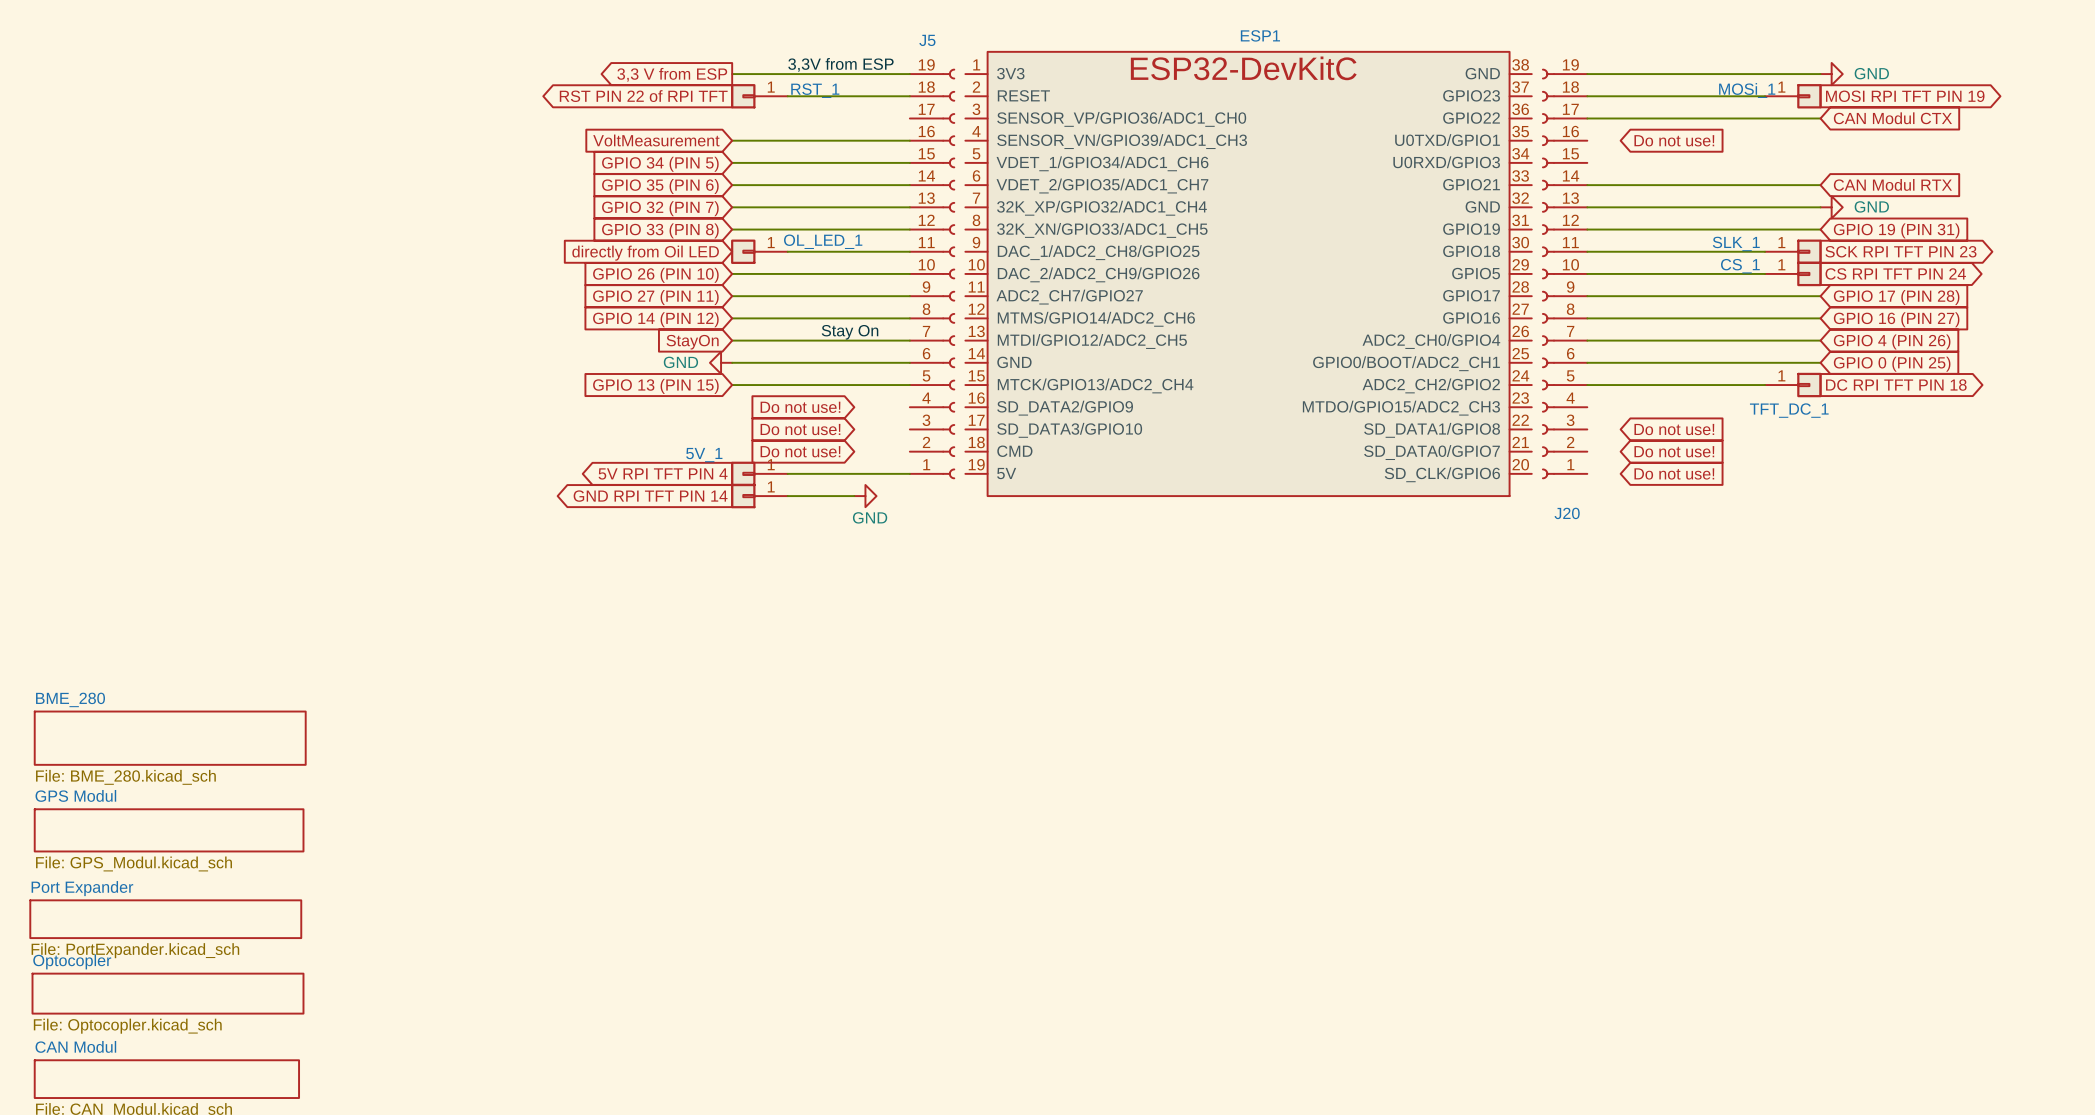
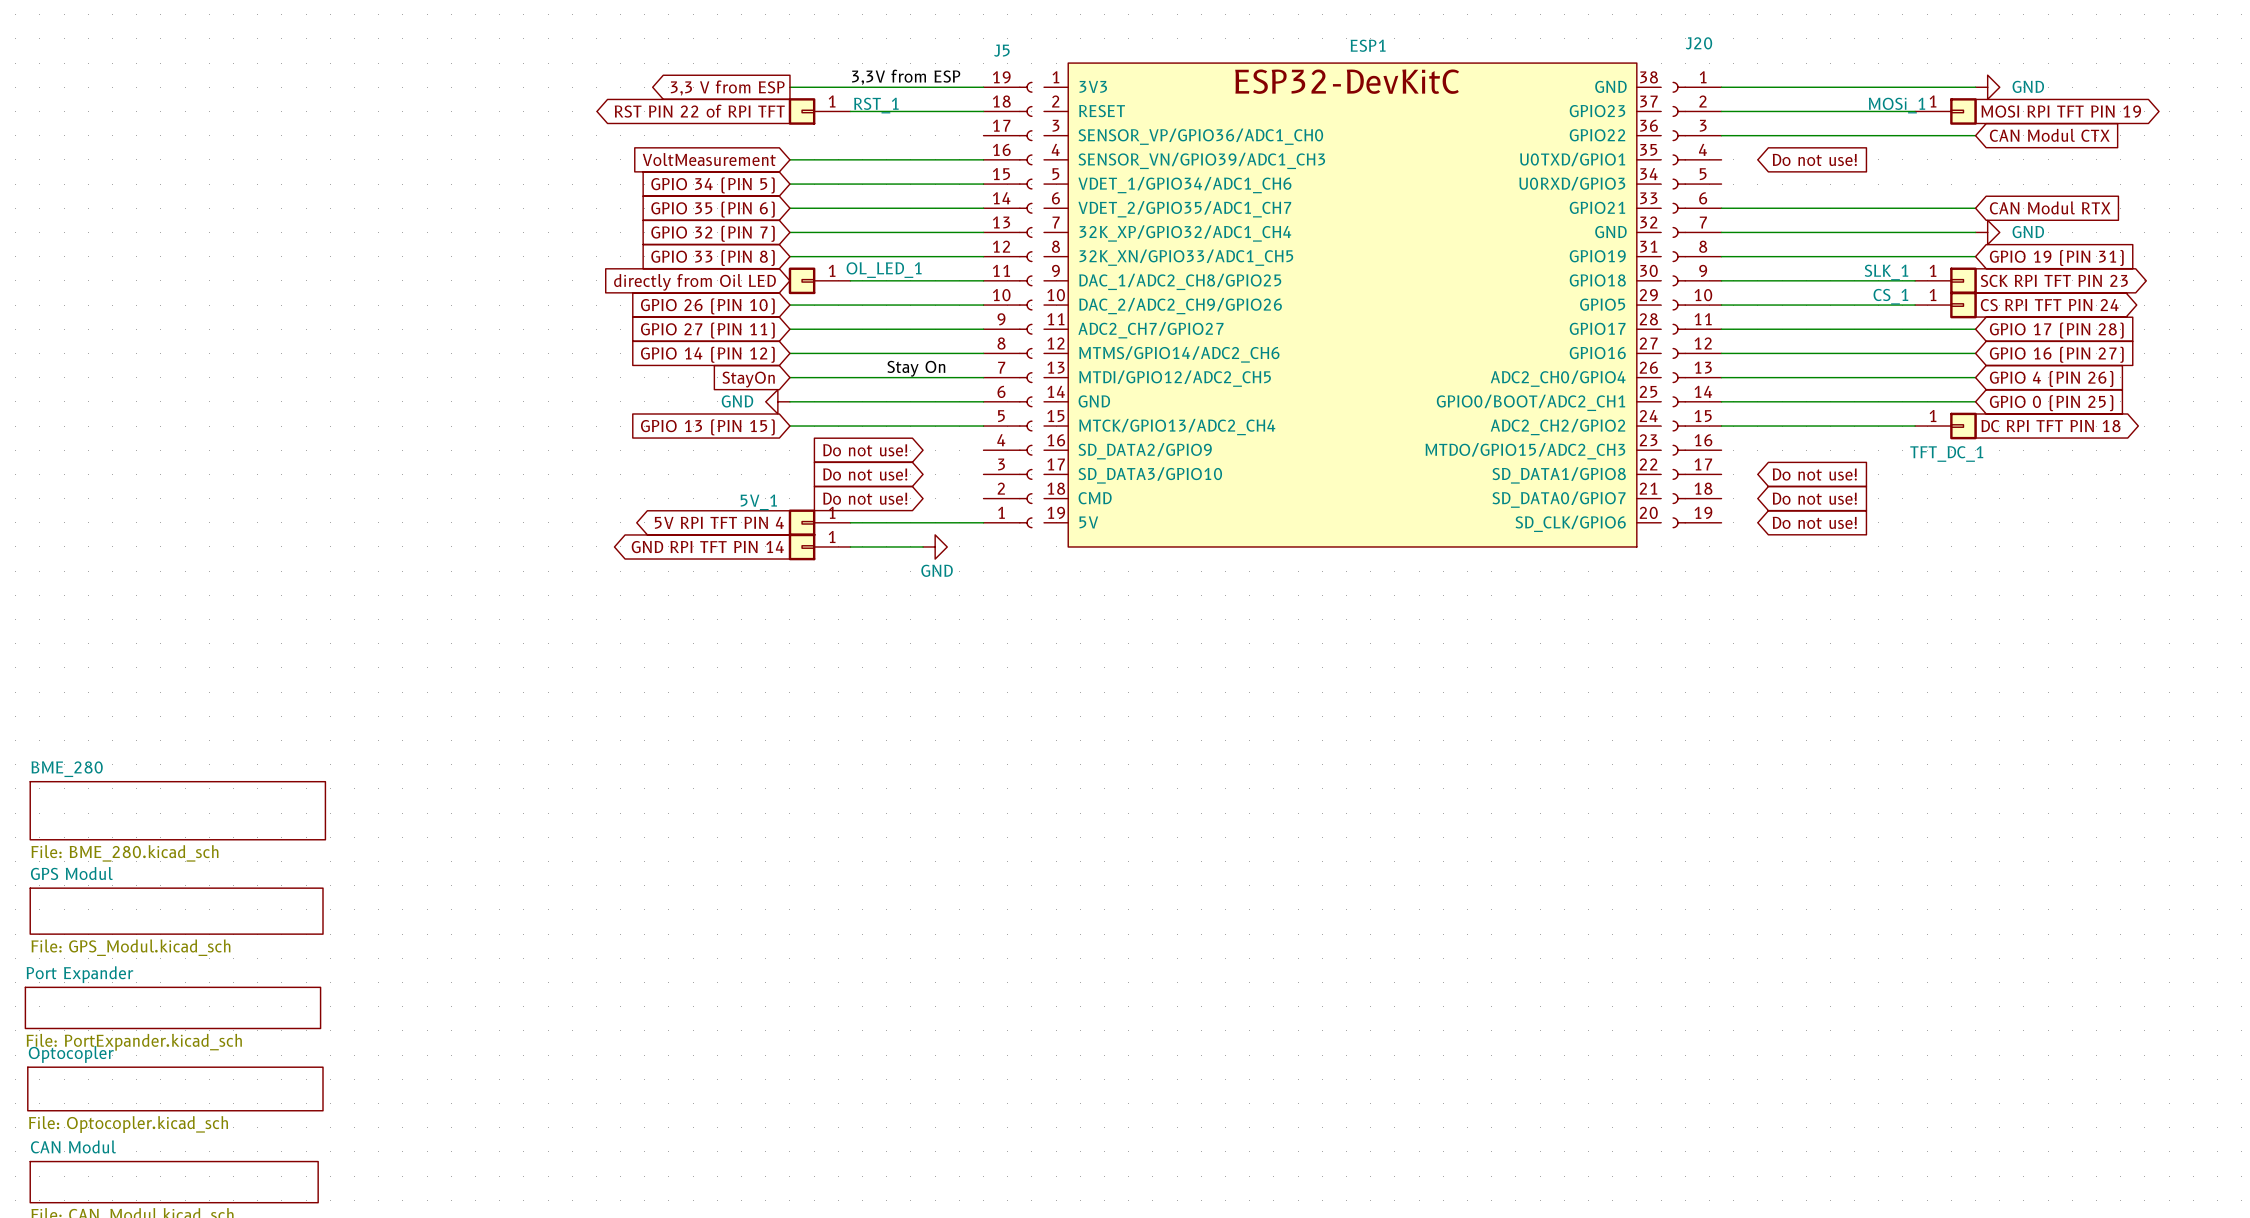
J20 flip: as is (1548, 273) -> up-down (1679, 305)

